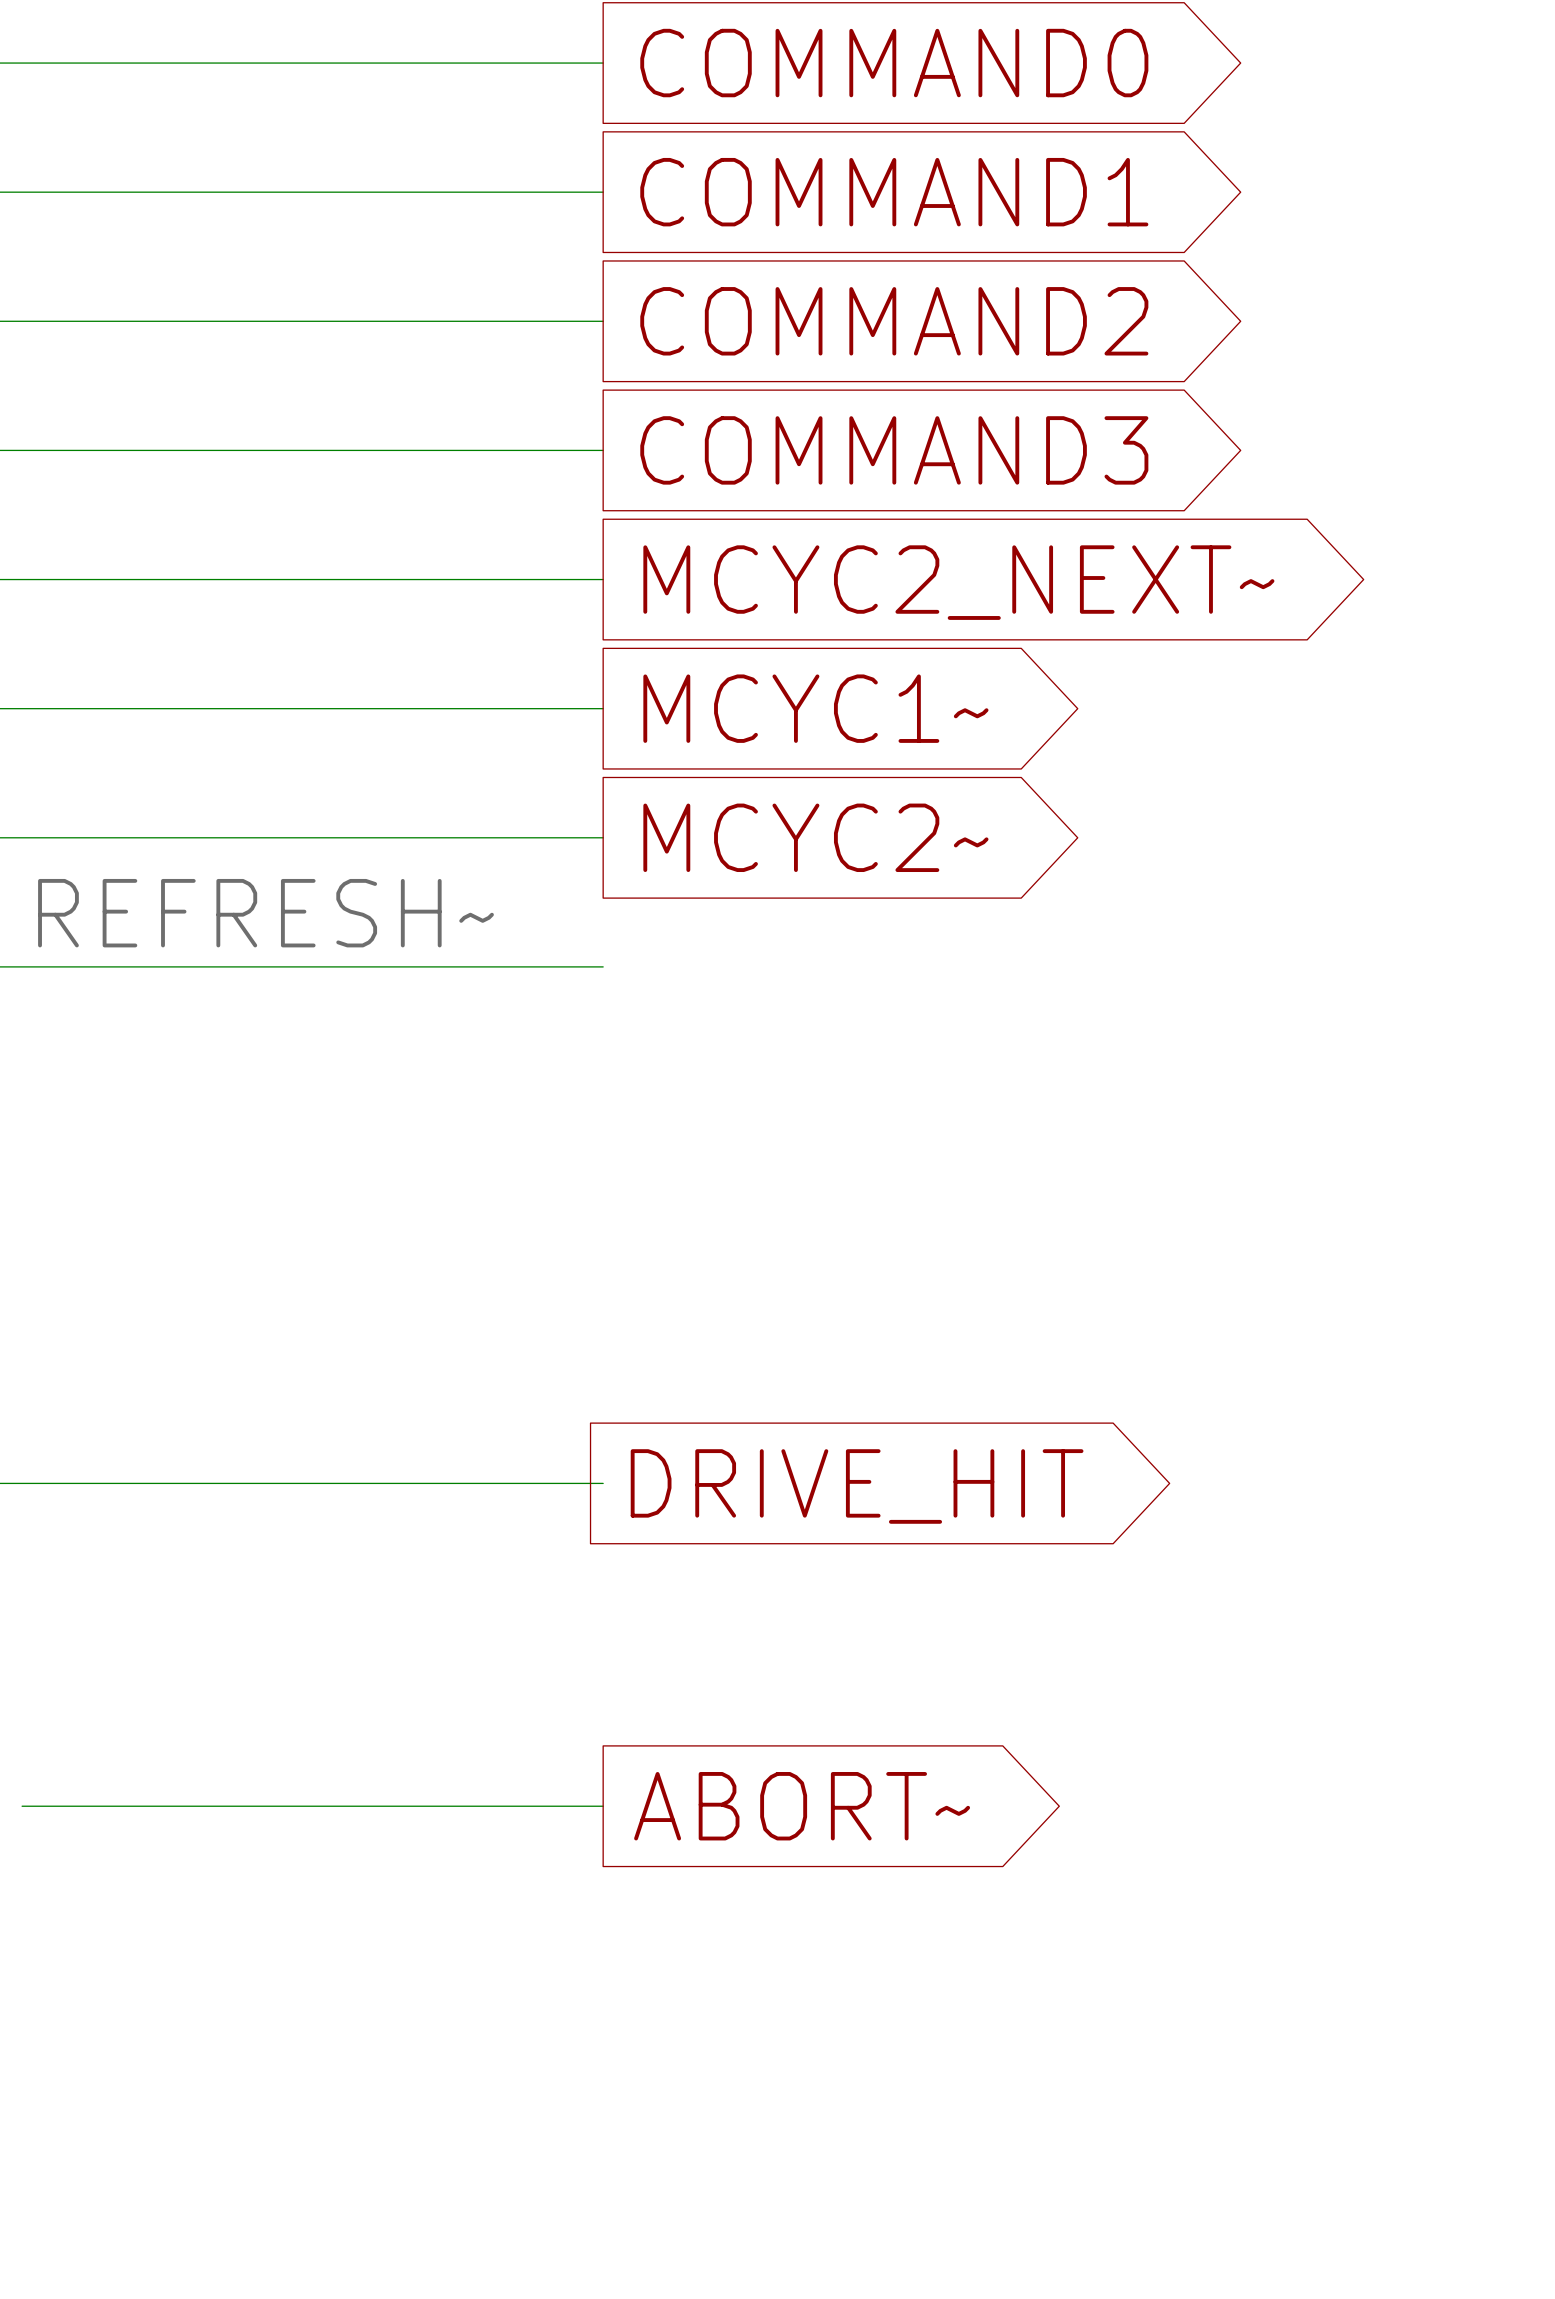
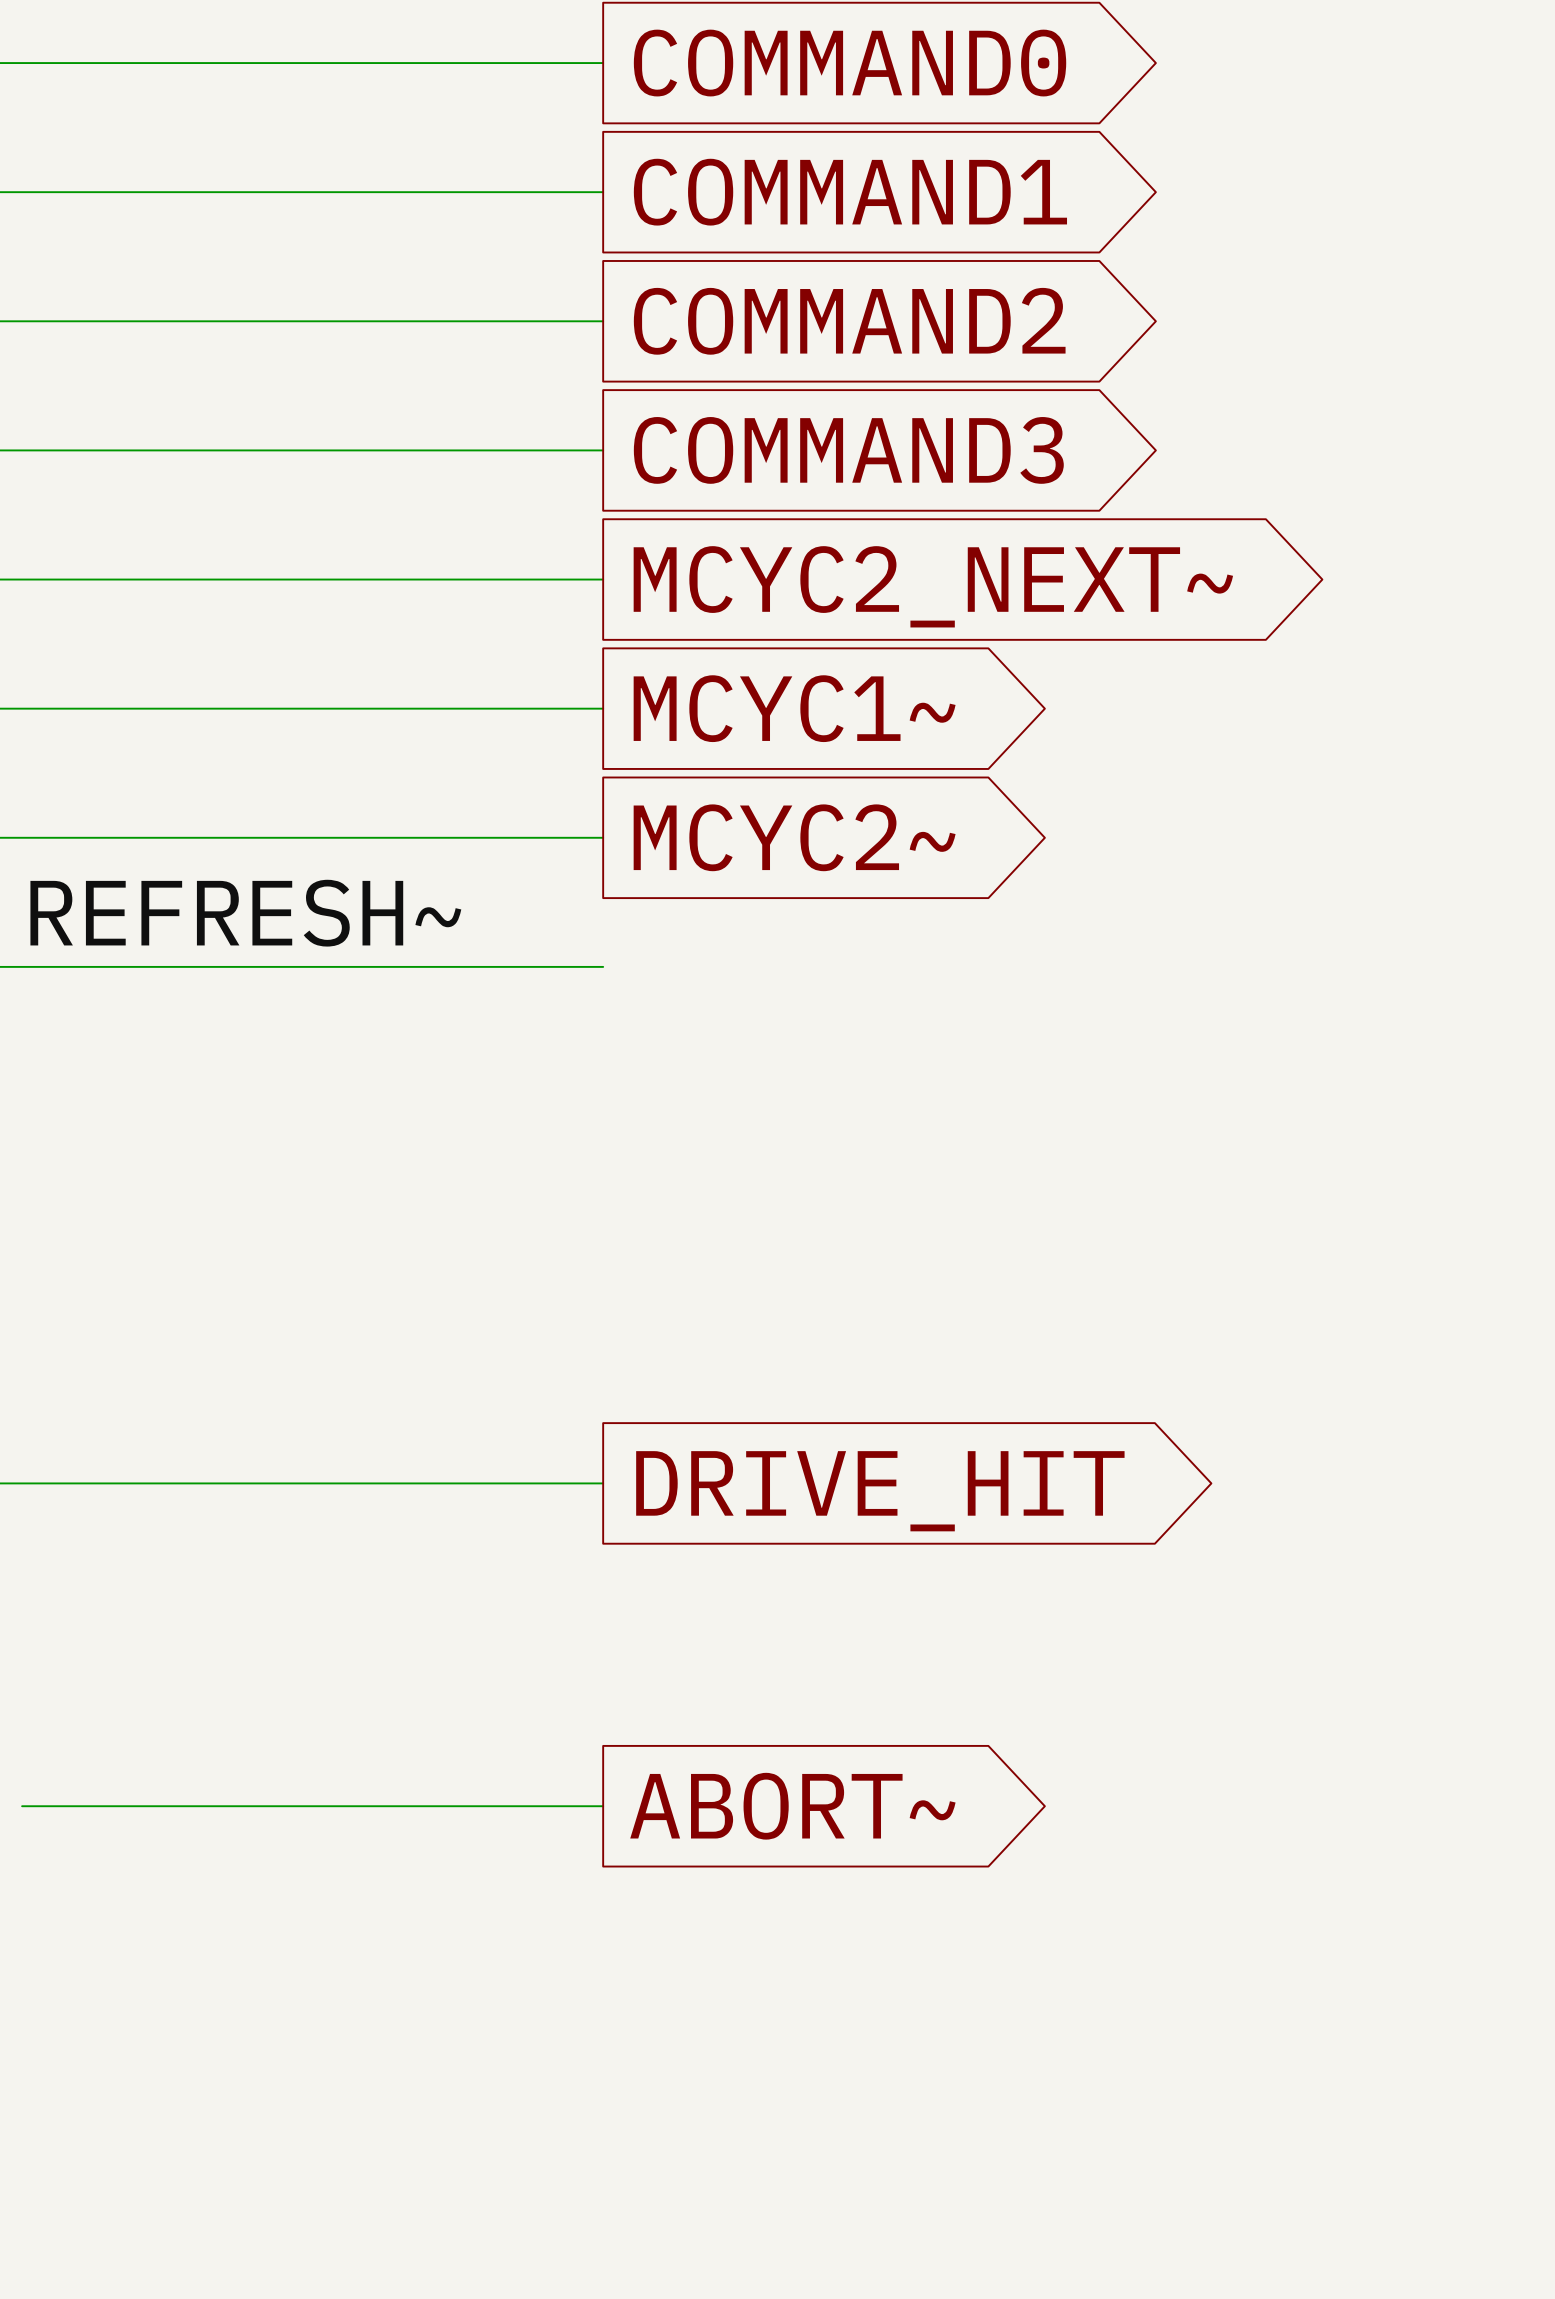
global label position: DRIVE_HIT (857, 1486) -> DRIVE_HIT (880, 1491)

